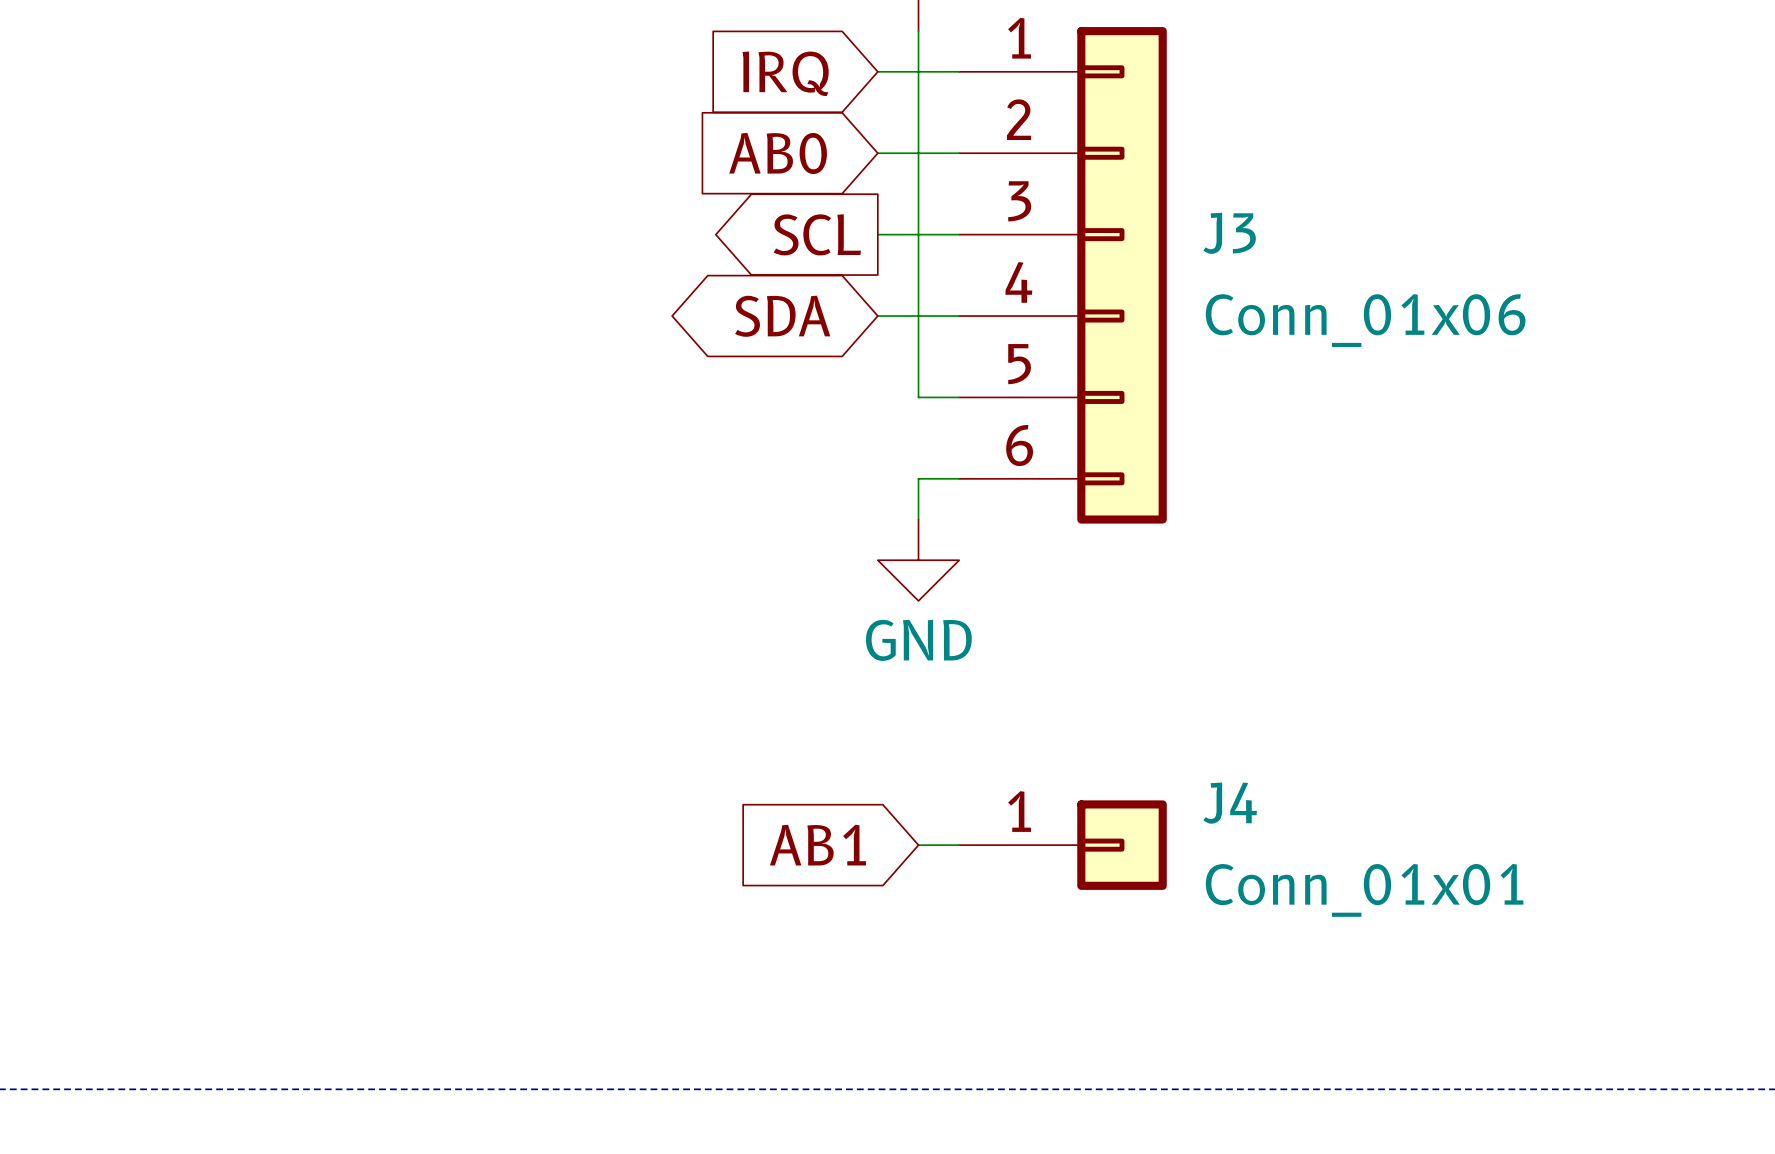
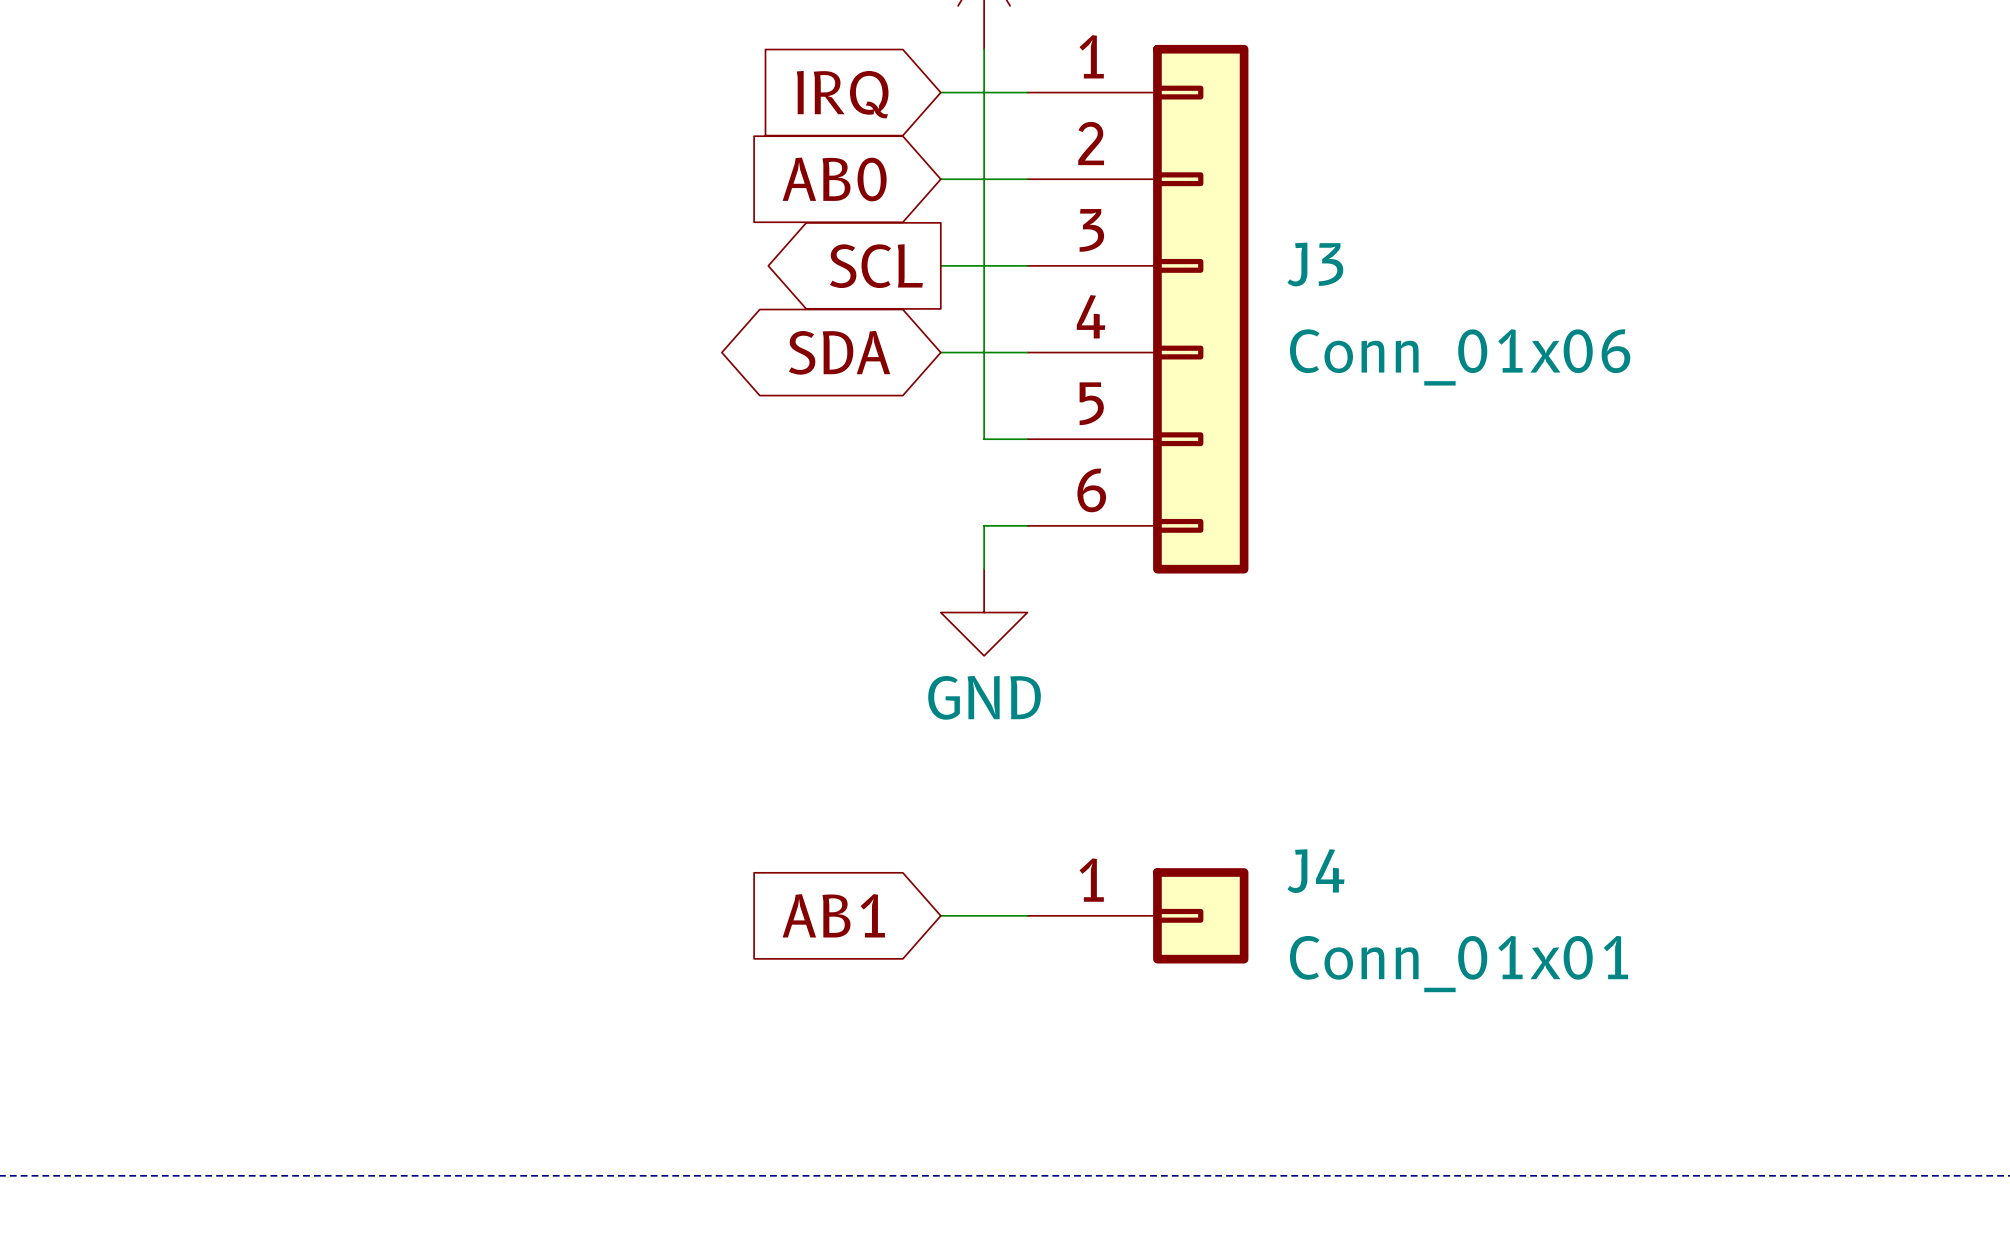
global label position: AB1 (817, 845) -> AB1 (833, 915)
wire: none -> (940, 915) (984, 915)

